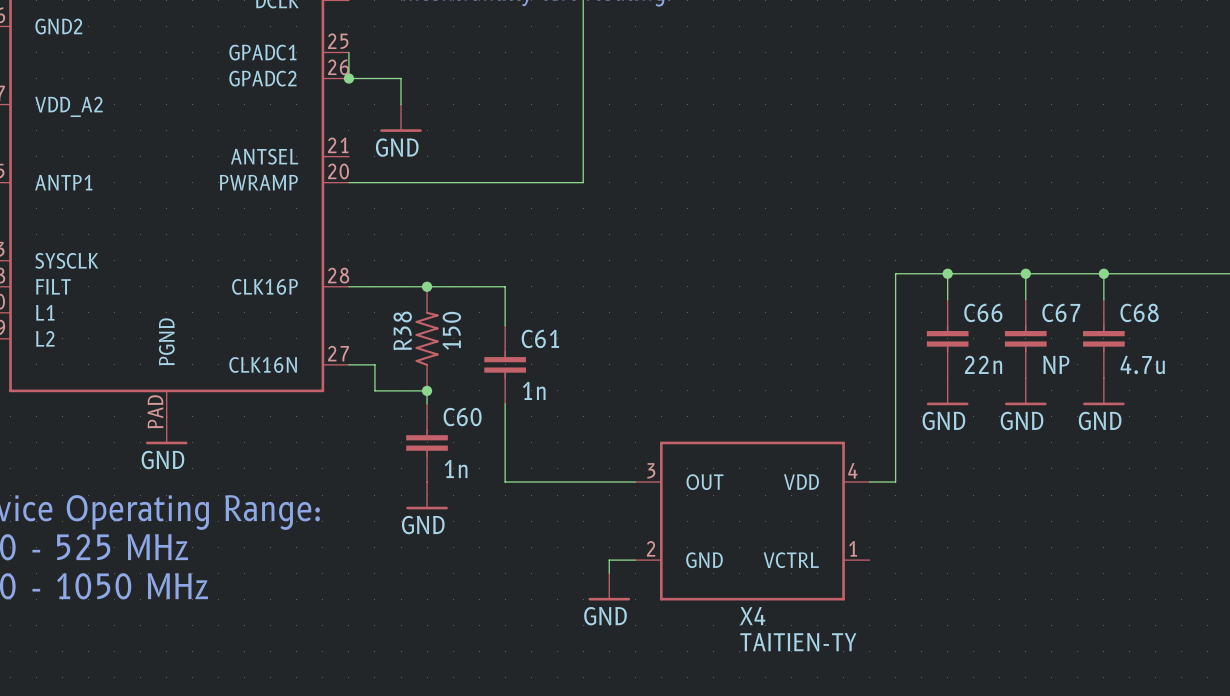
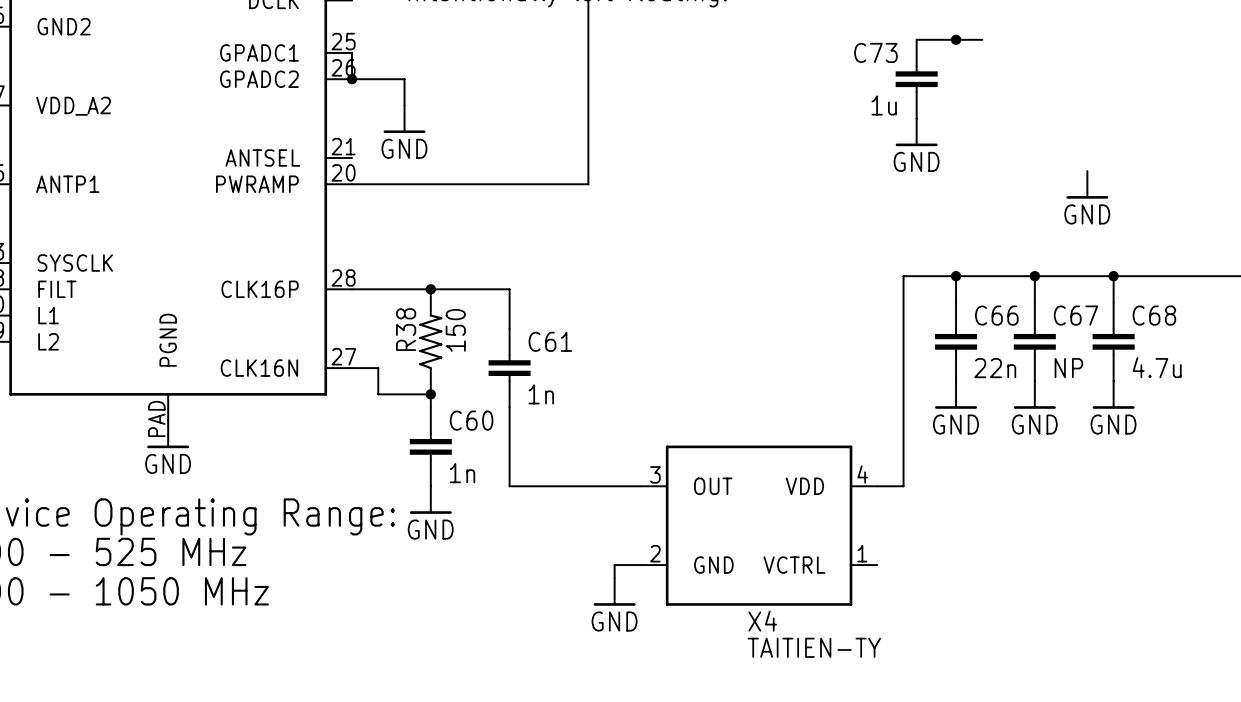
wire: none -> (916, 39) (982, 39)
junction: none -> (956, 39)
C73: none -> 1u (916, 79)
power symbol: none -> GND (916, 132)
power symbol: none -> GND (1087, 184)

